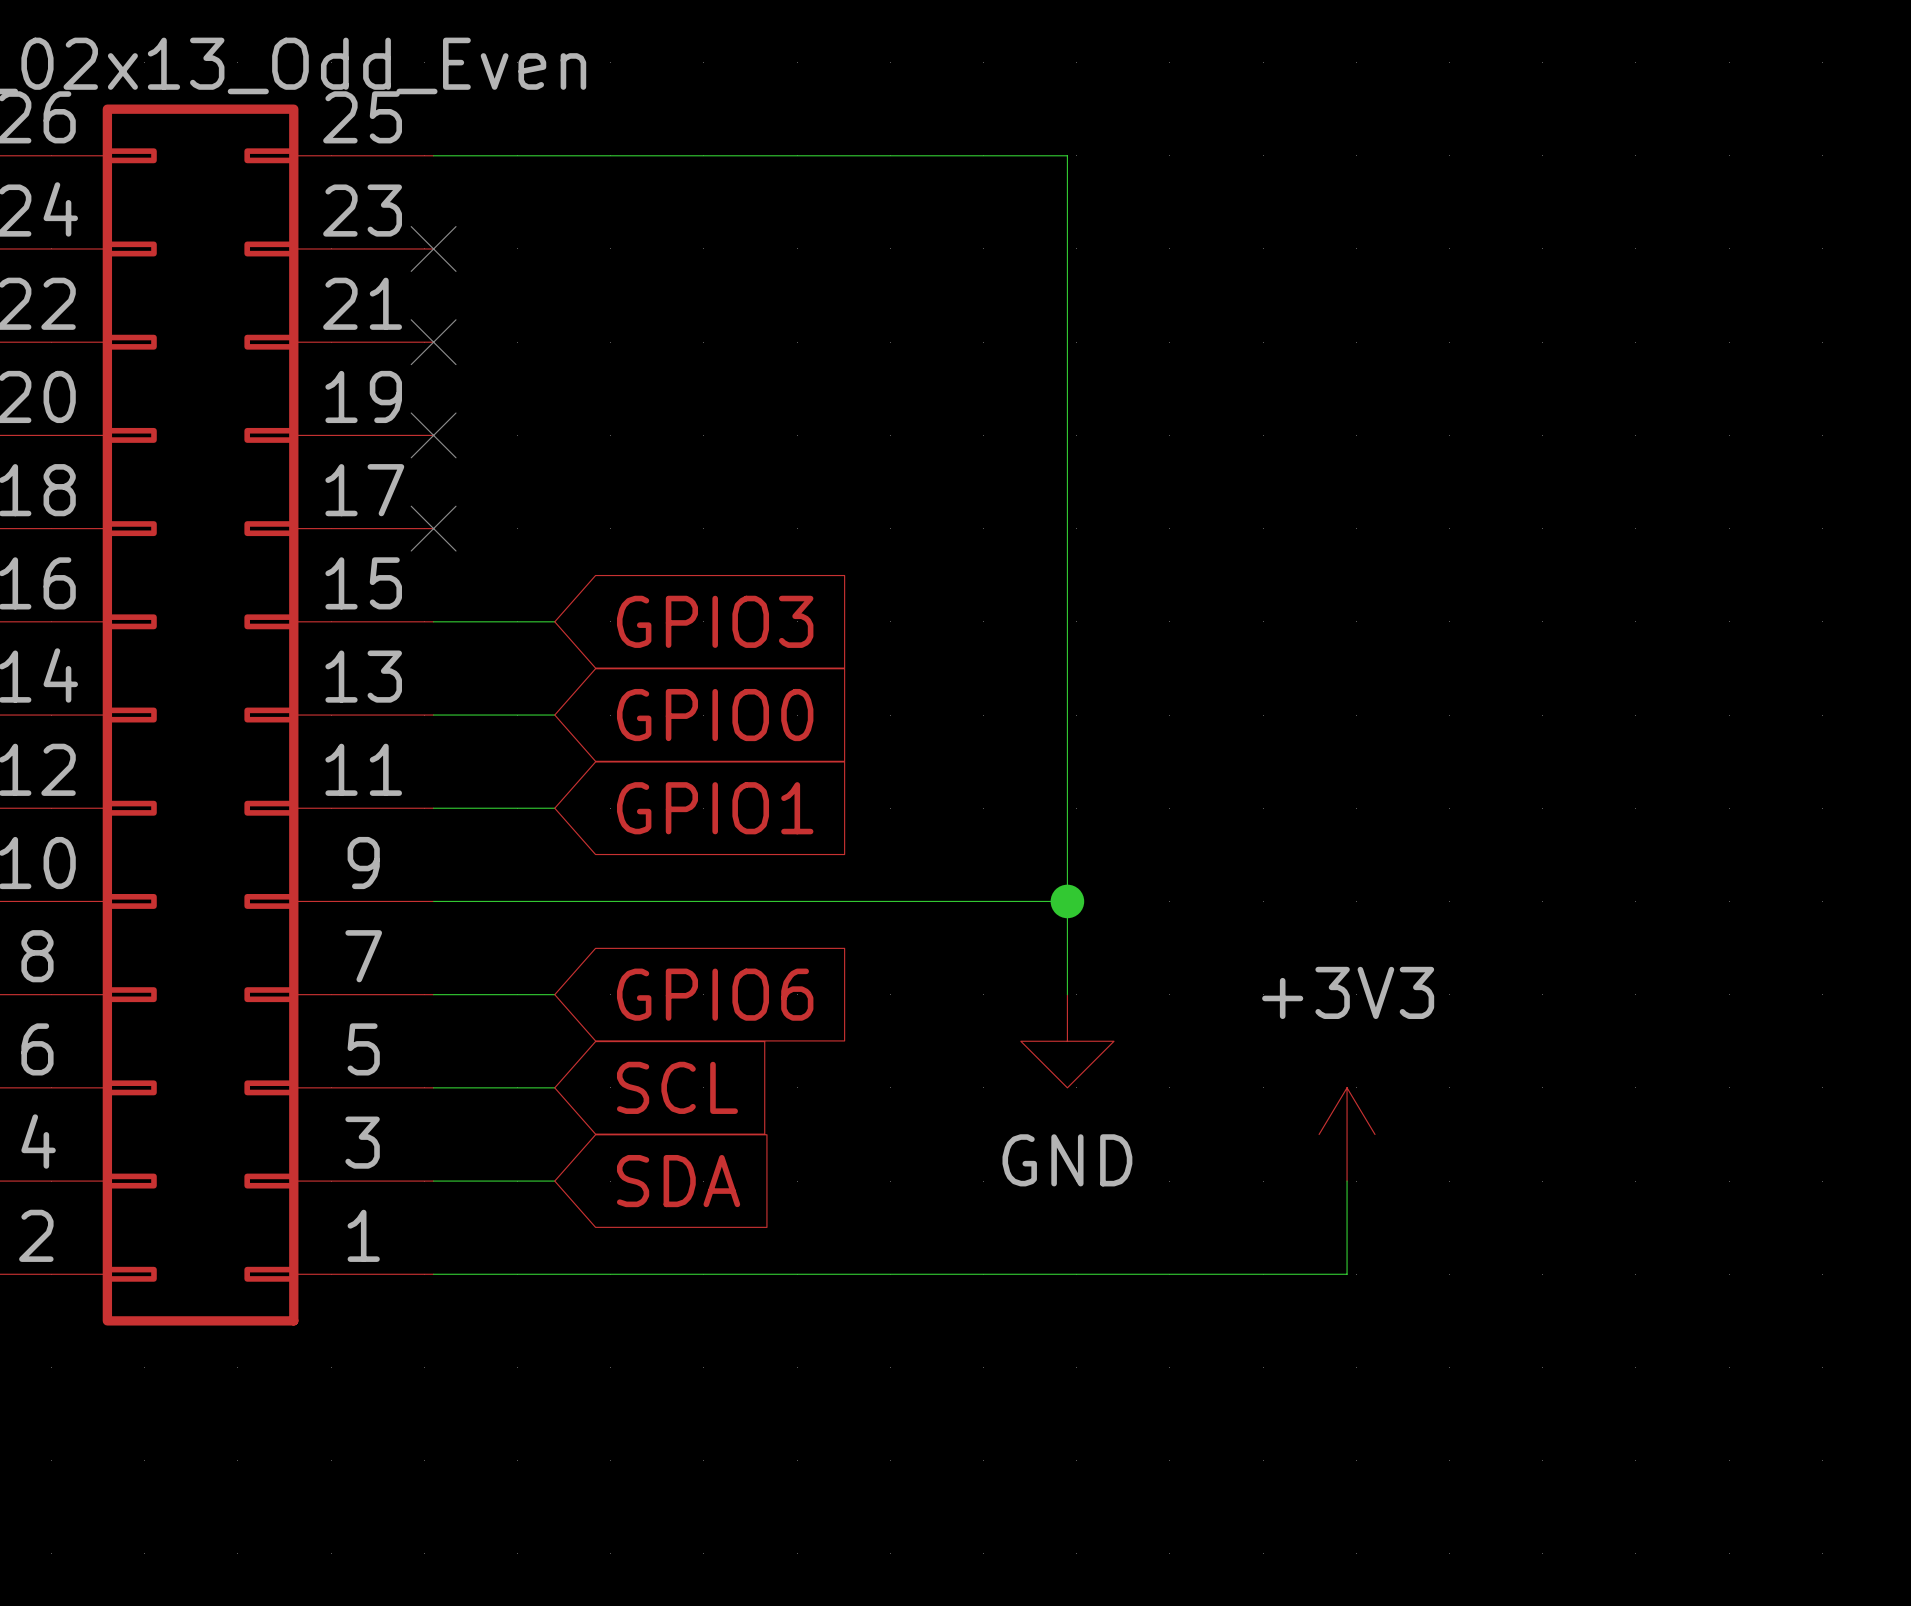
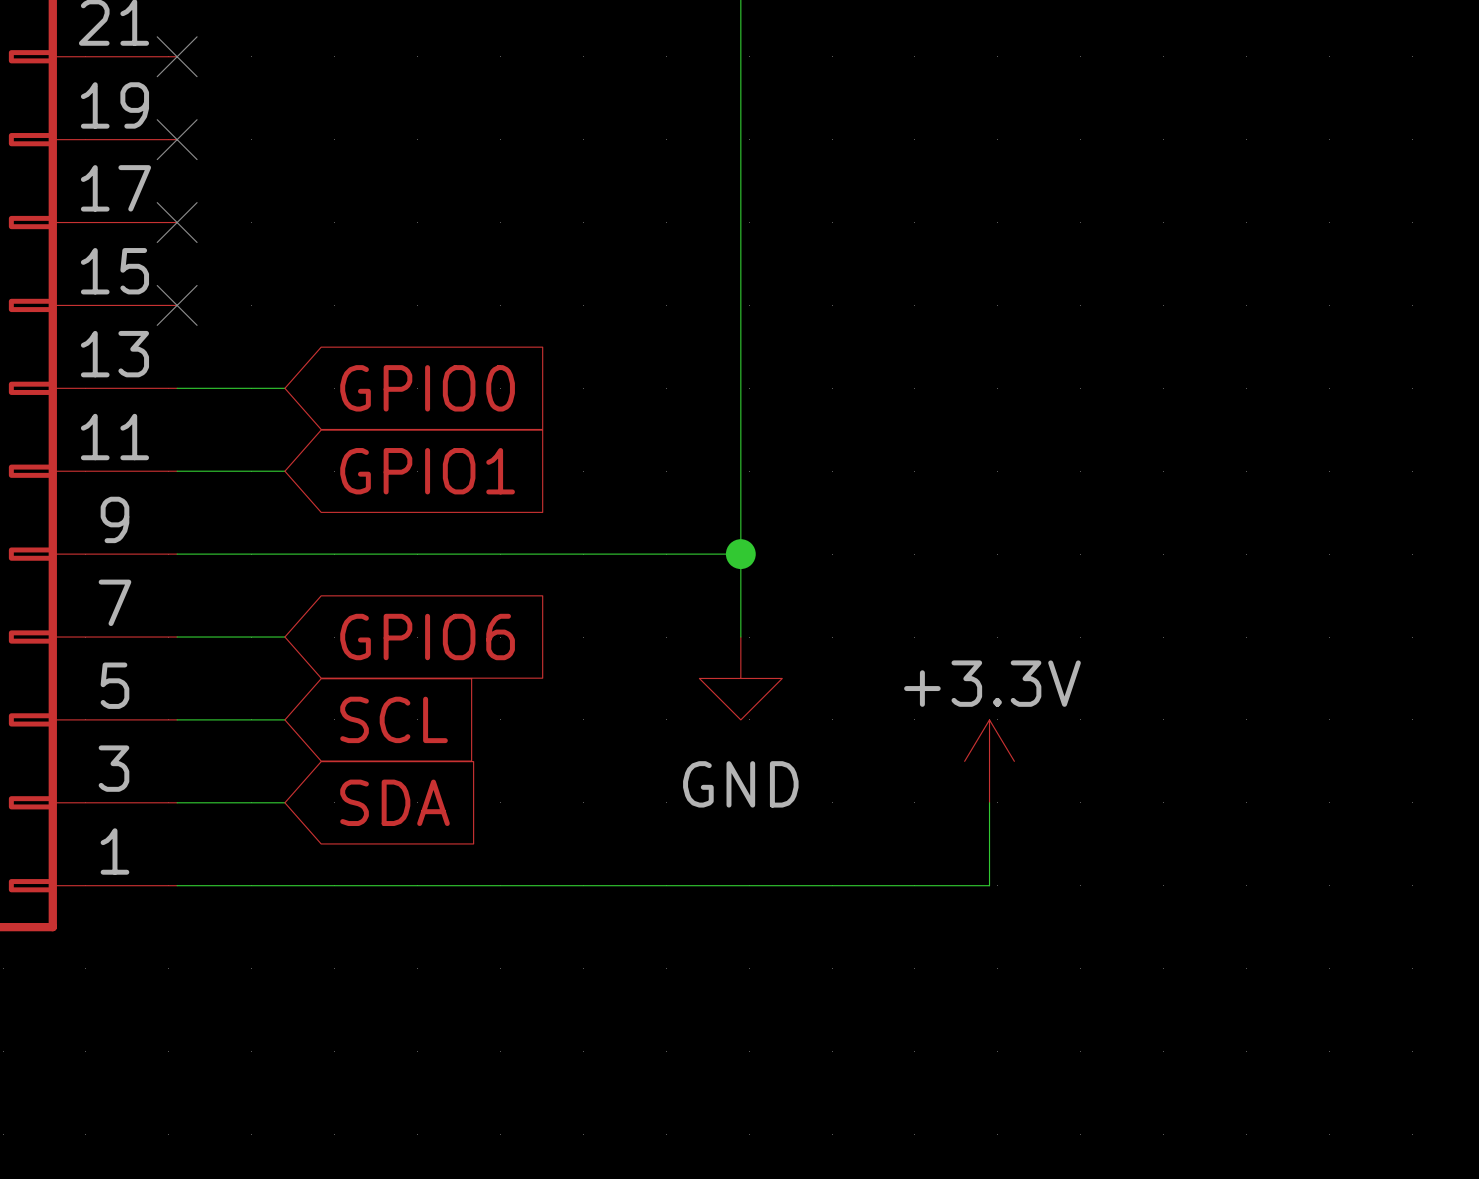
wire: (433, 621) (554, 621) -> none
no-connect mark: none -> (177, 305)
global label: GPIO3 (715, 621) -> none
power symbol: +3V3 (1347, 1134) -> +3.3V (989, 761)

